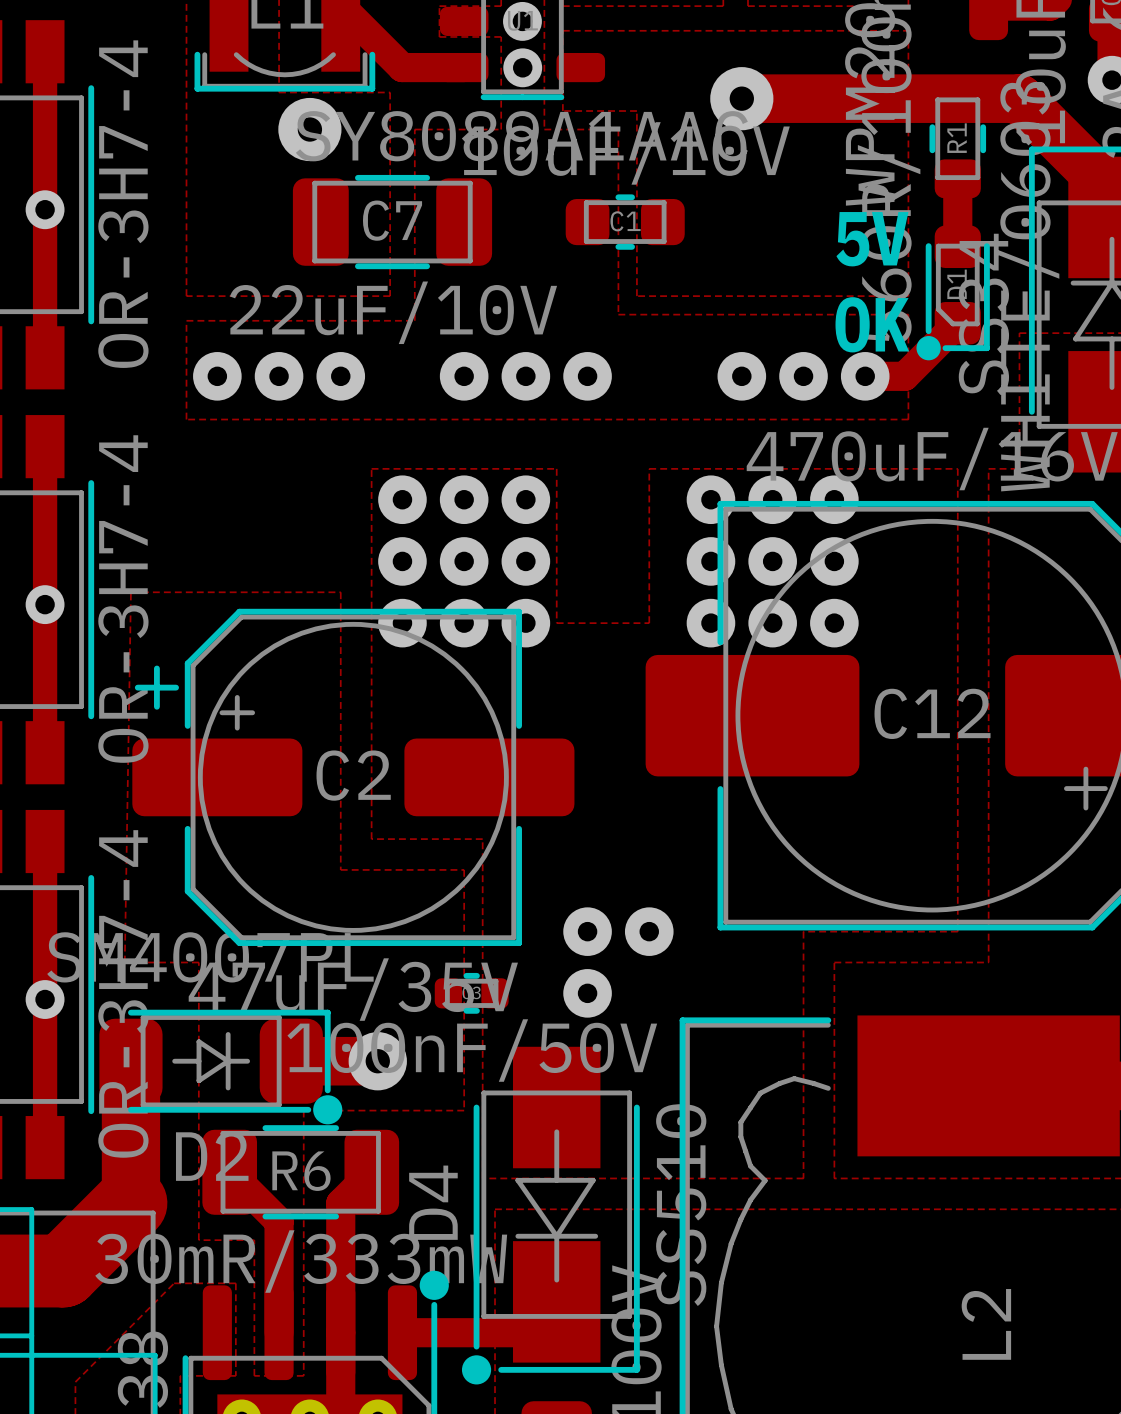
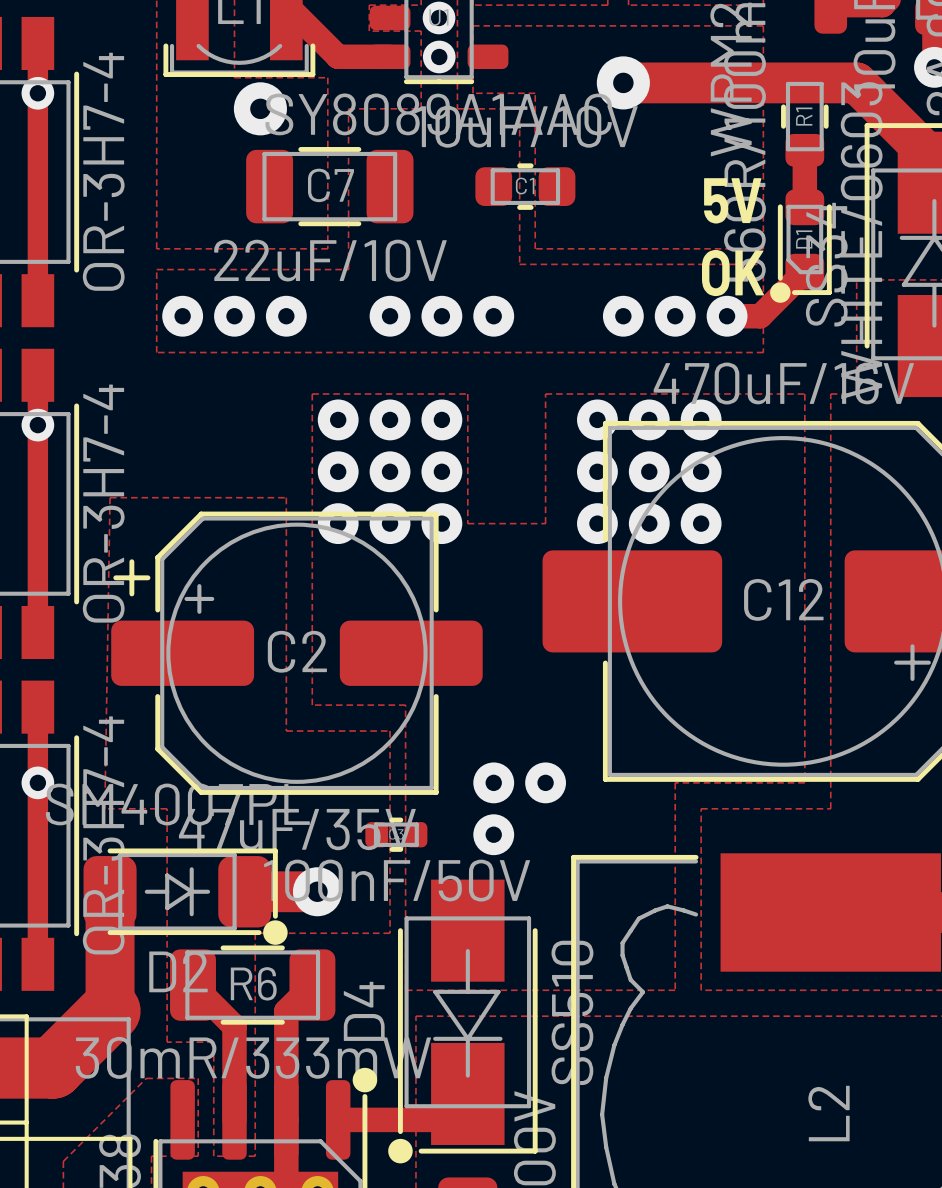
via position: (45, 209) -> (37, 93)
via position: (45, 604) -> (37, 425)
via position: (45, 999) -> (37, 782)

